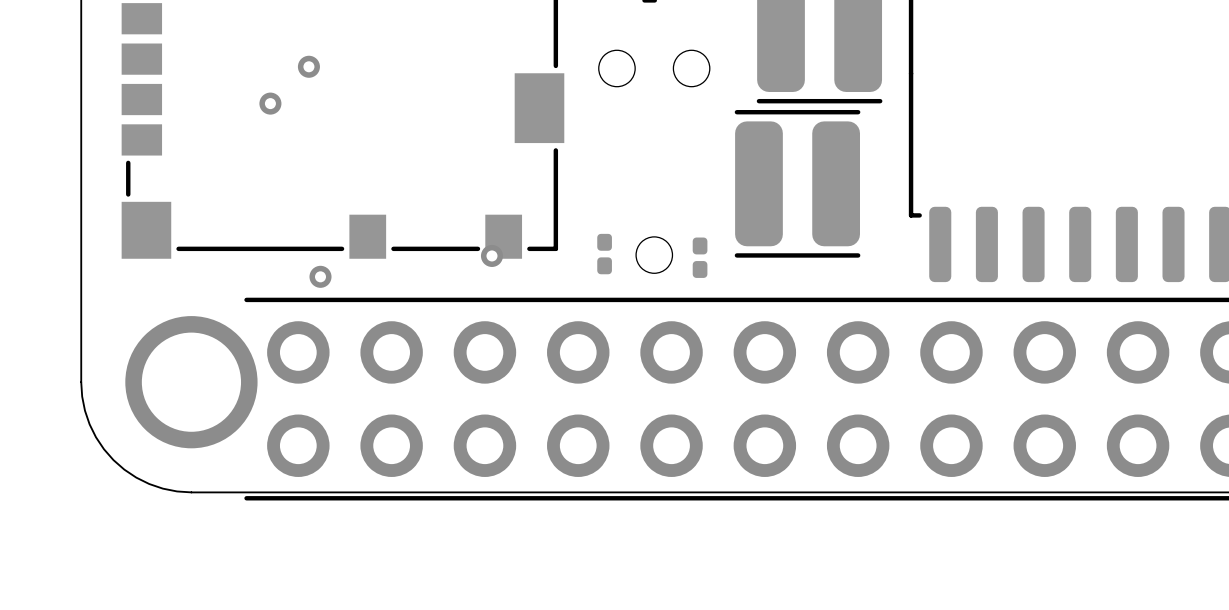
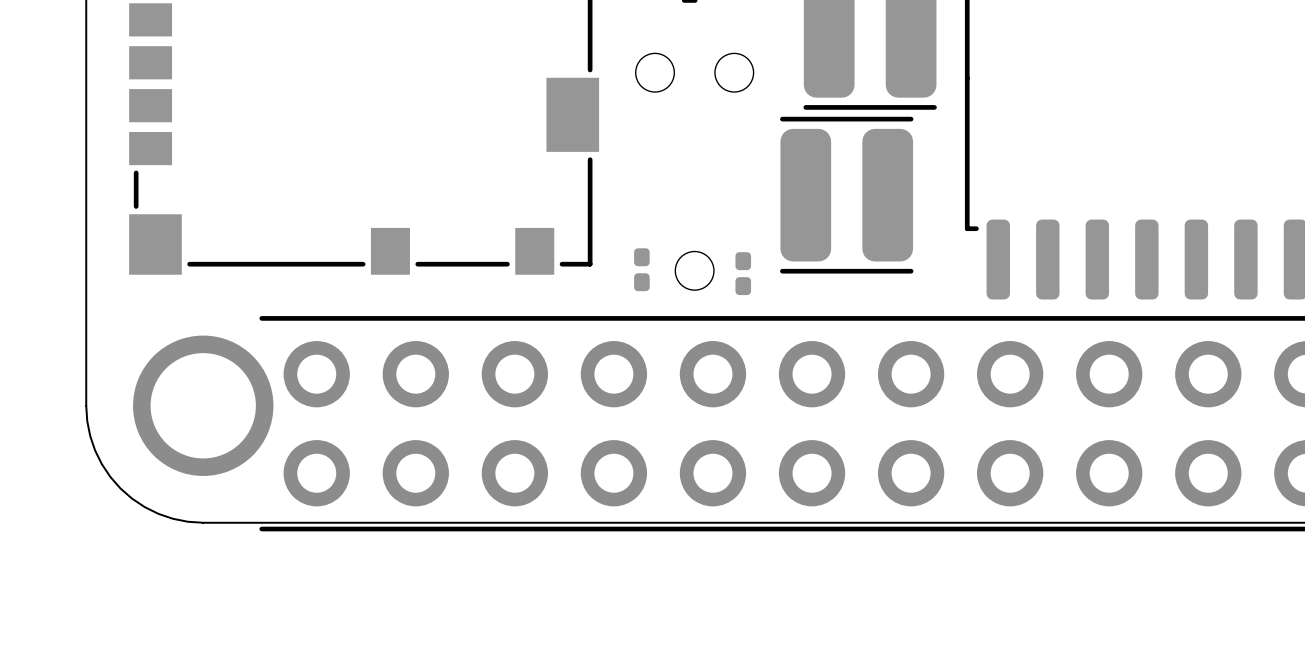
via: (308, 66) -> none
via: (270, 103) -> none
via: (491, 255) -> none
via: (320, 276) -> none

